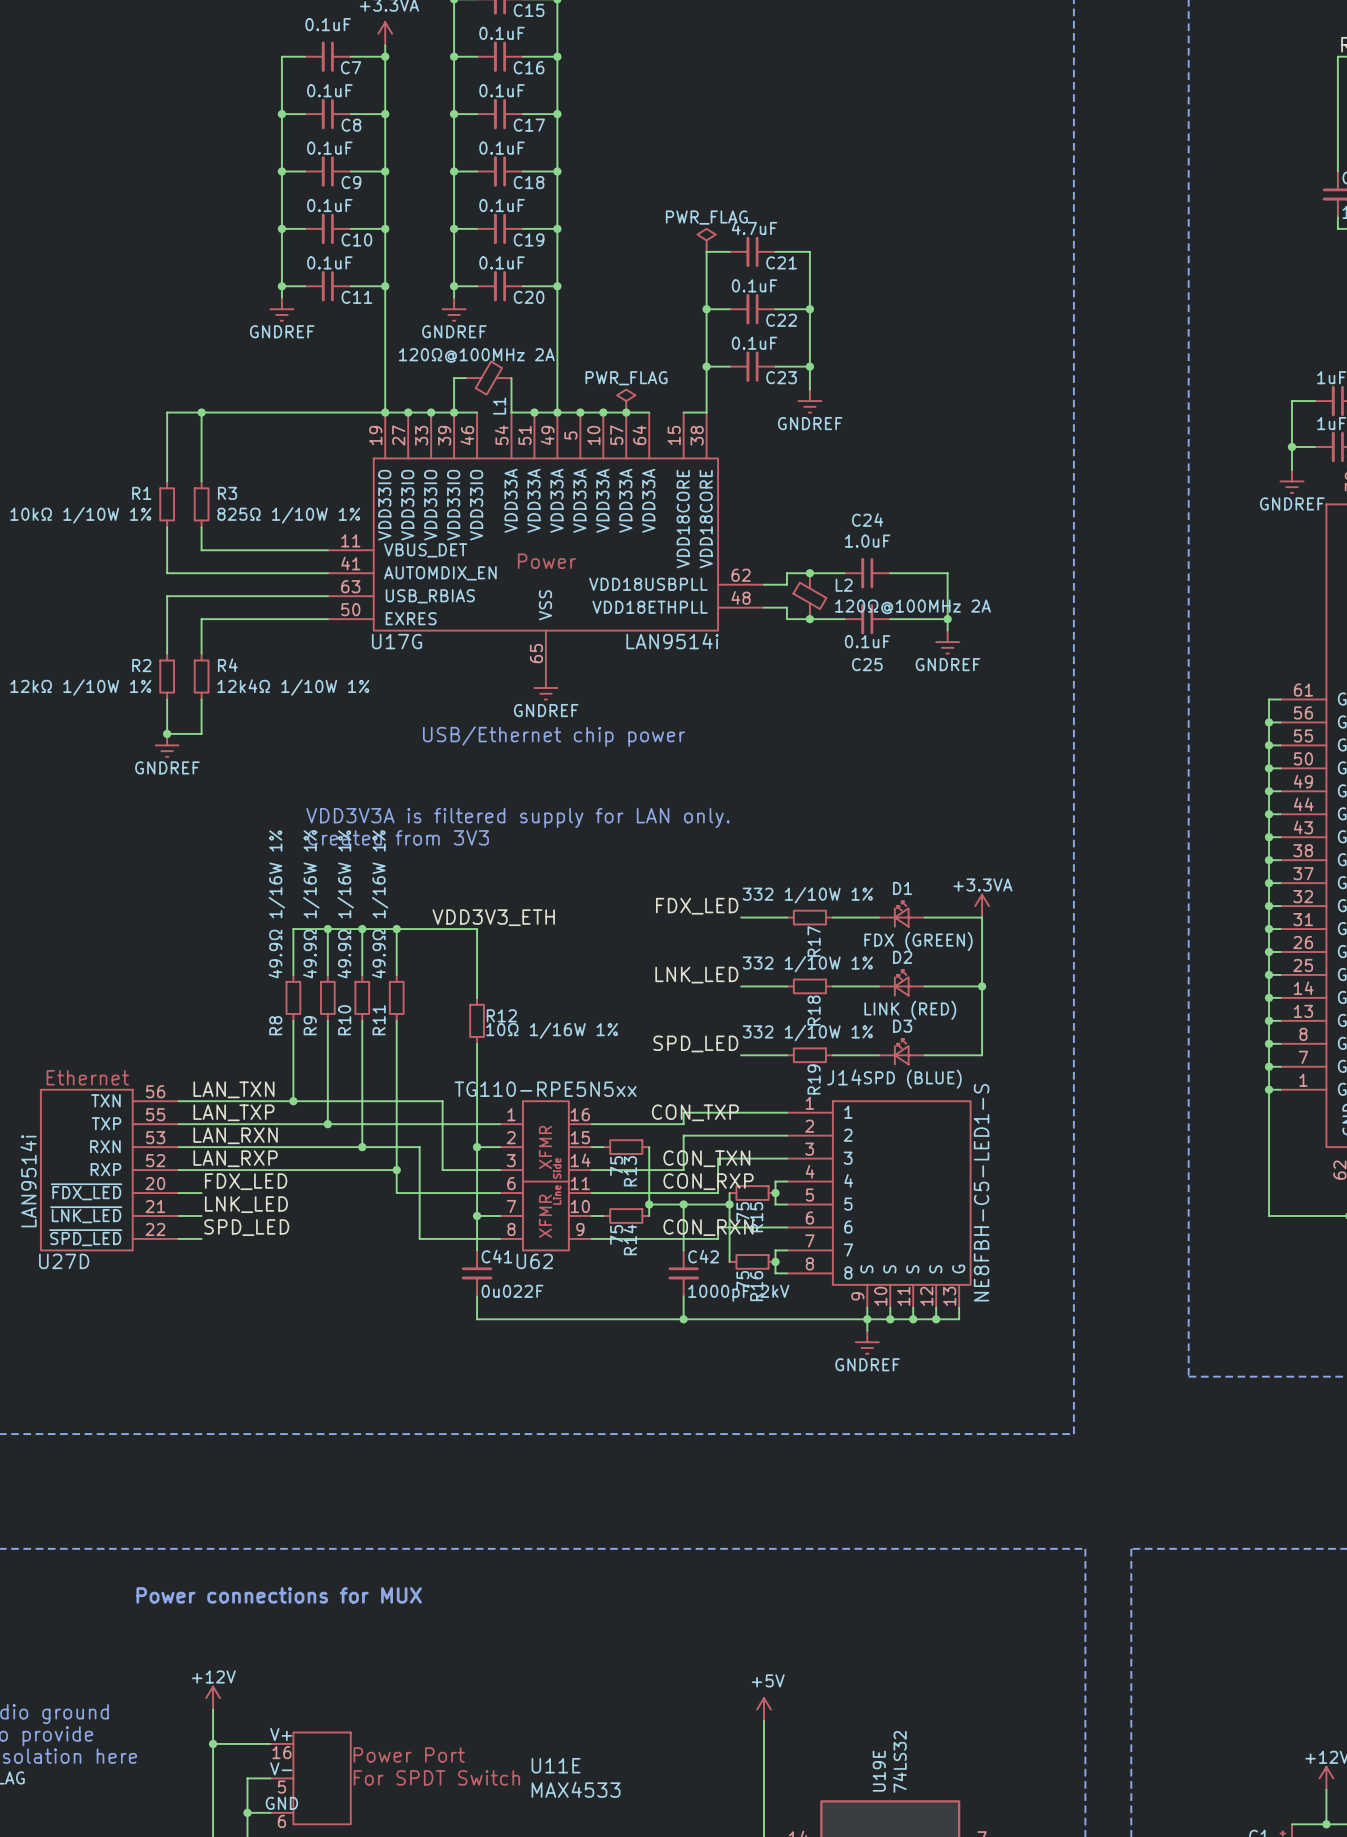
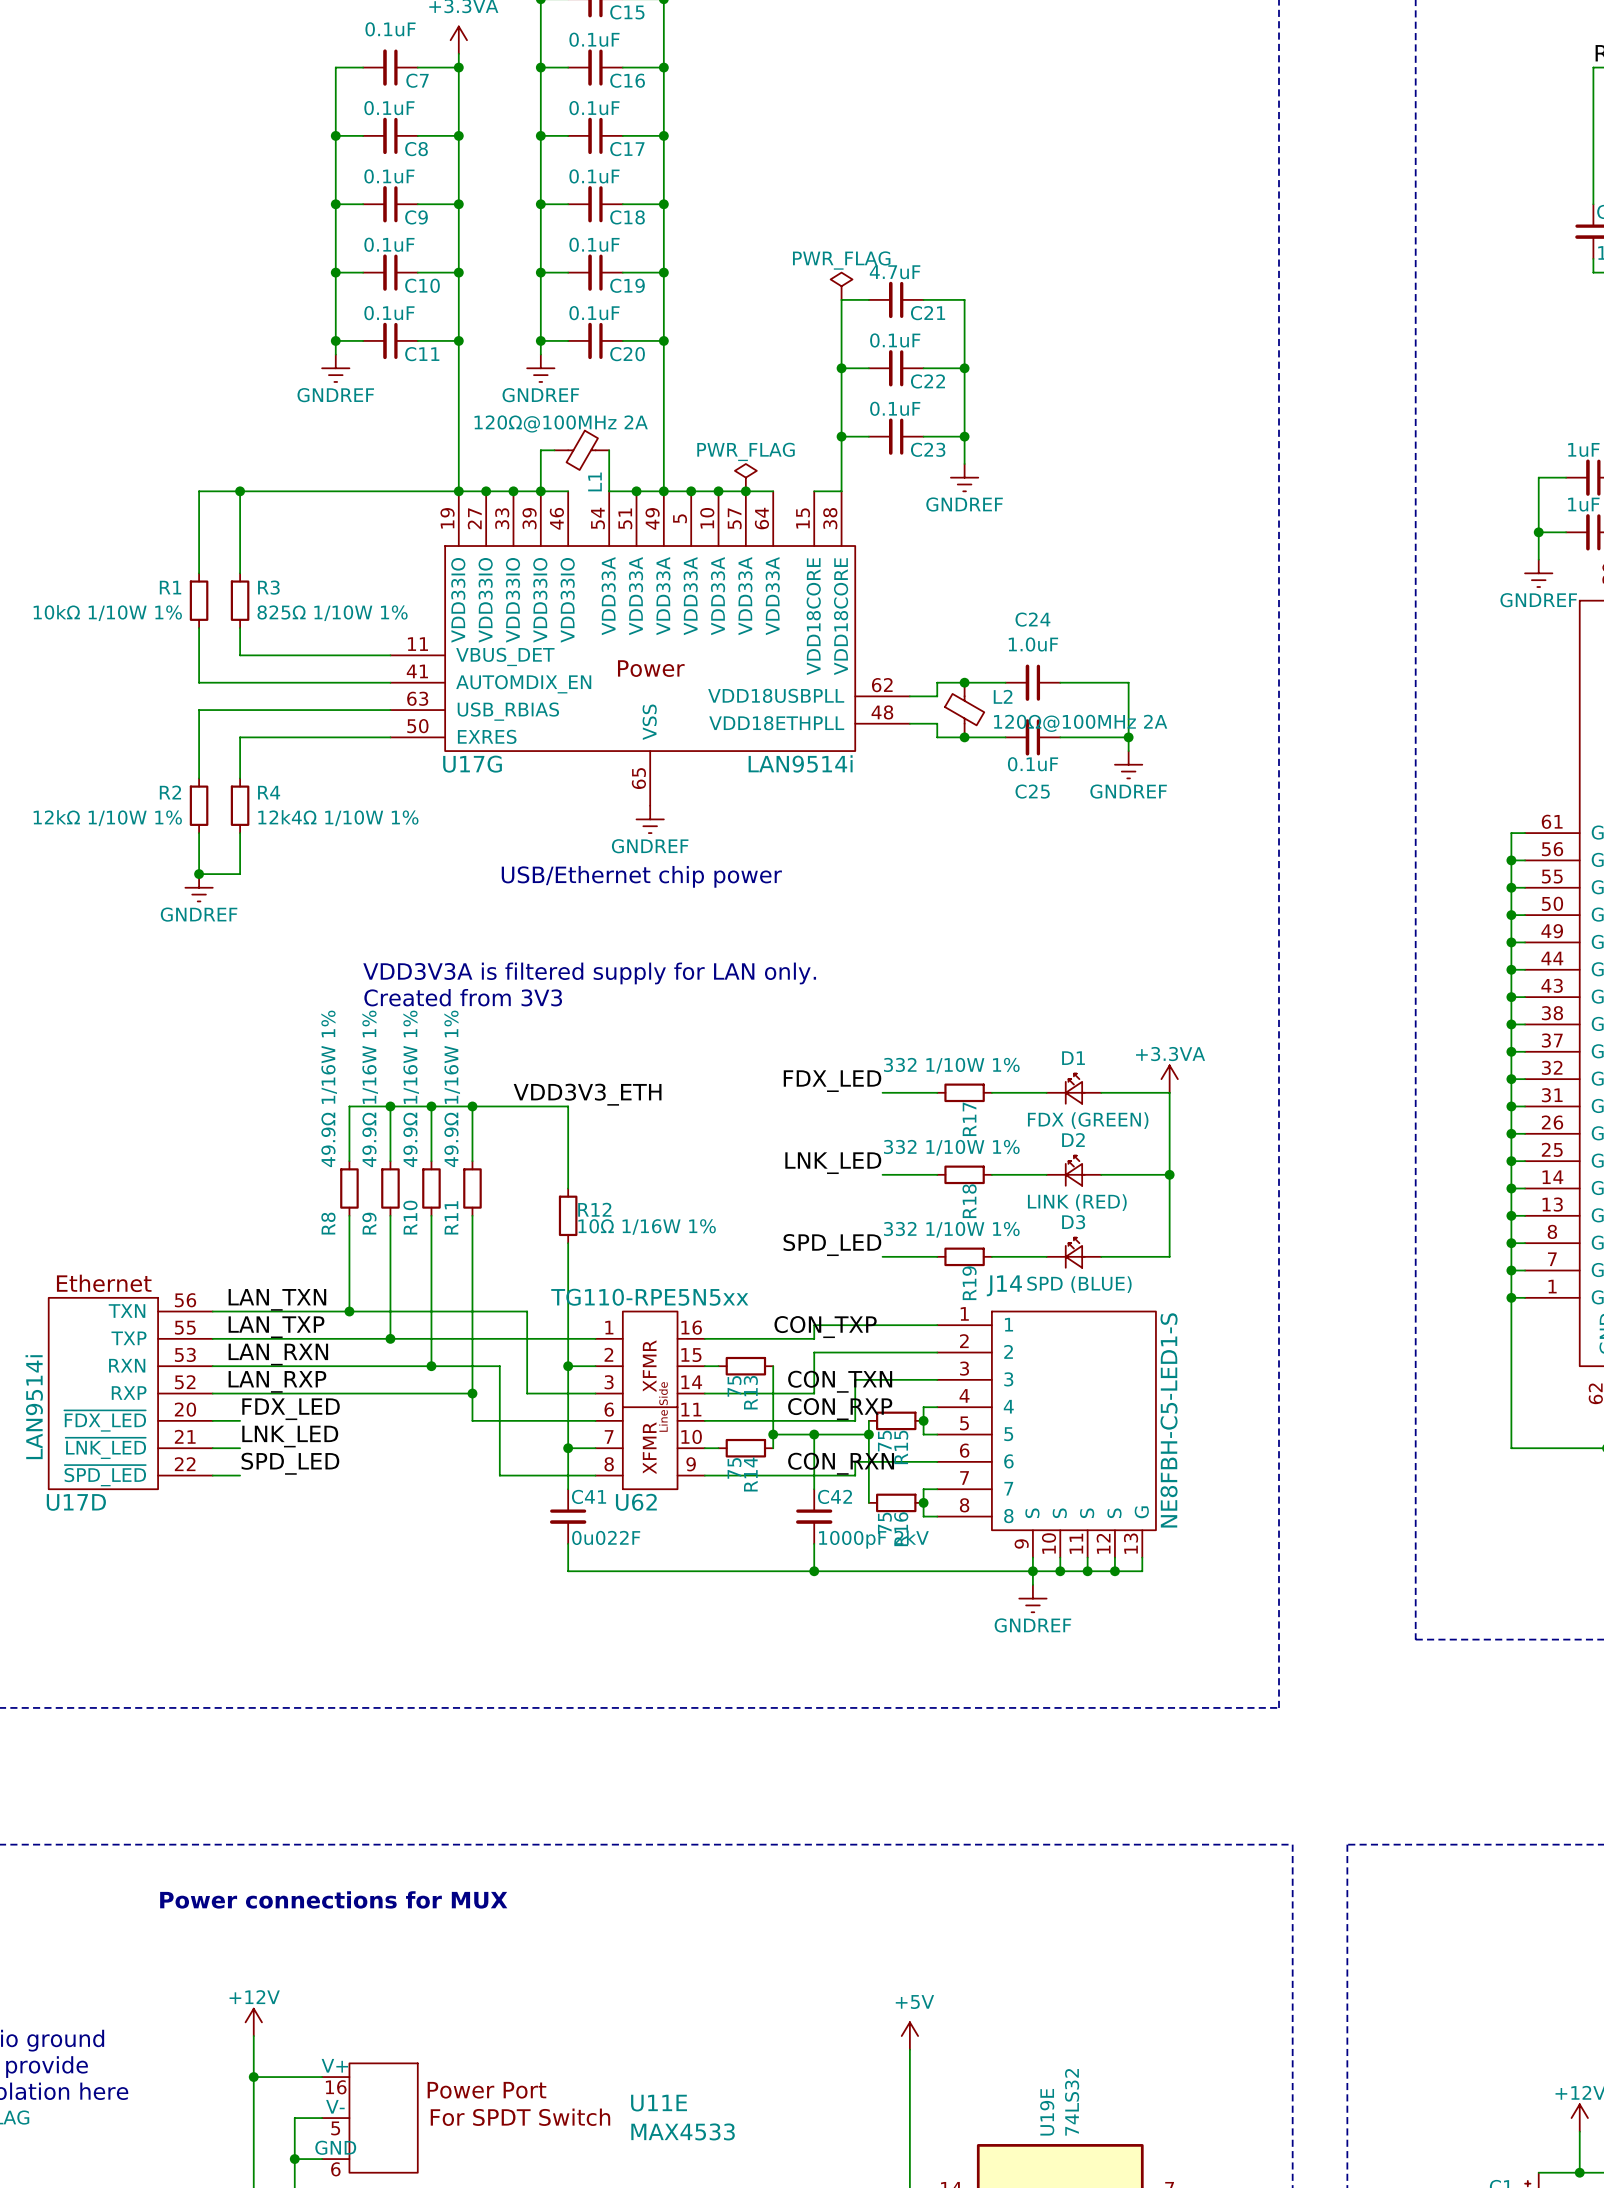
U27D name: U27D (64, 1261) -> U17D (76, 1502)

